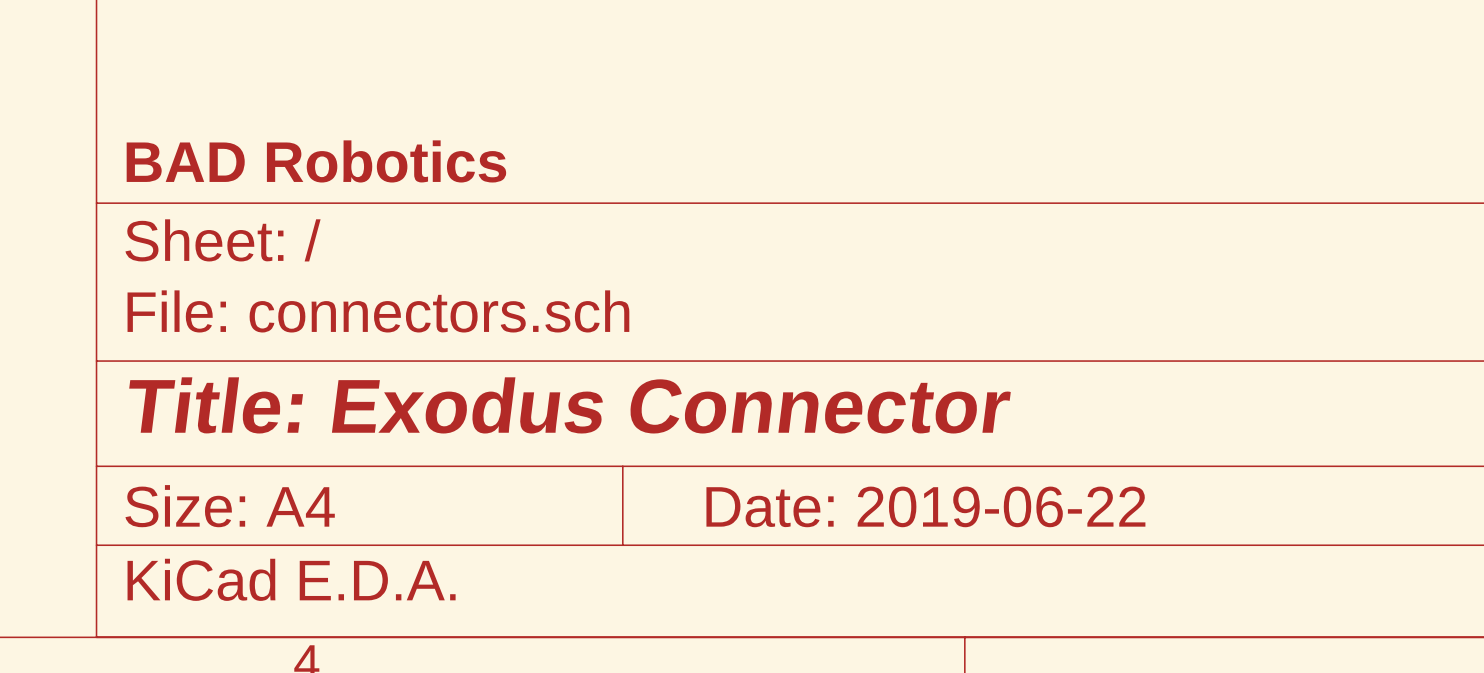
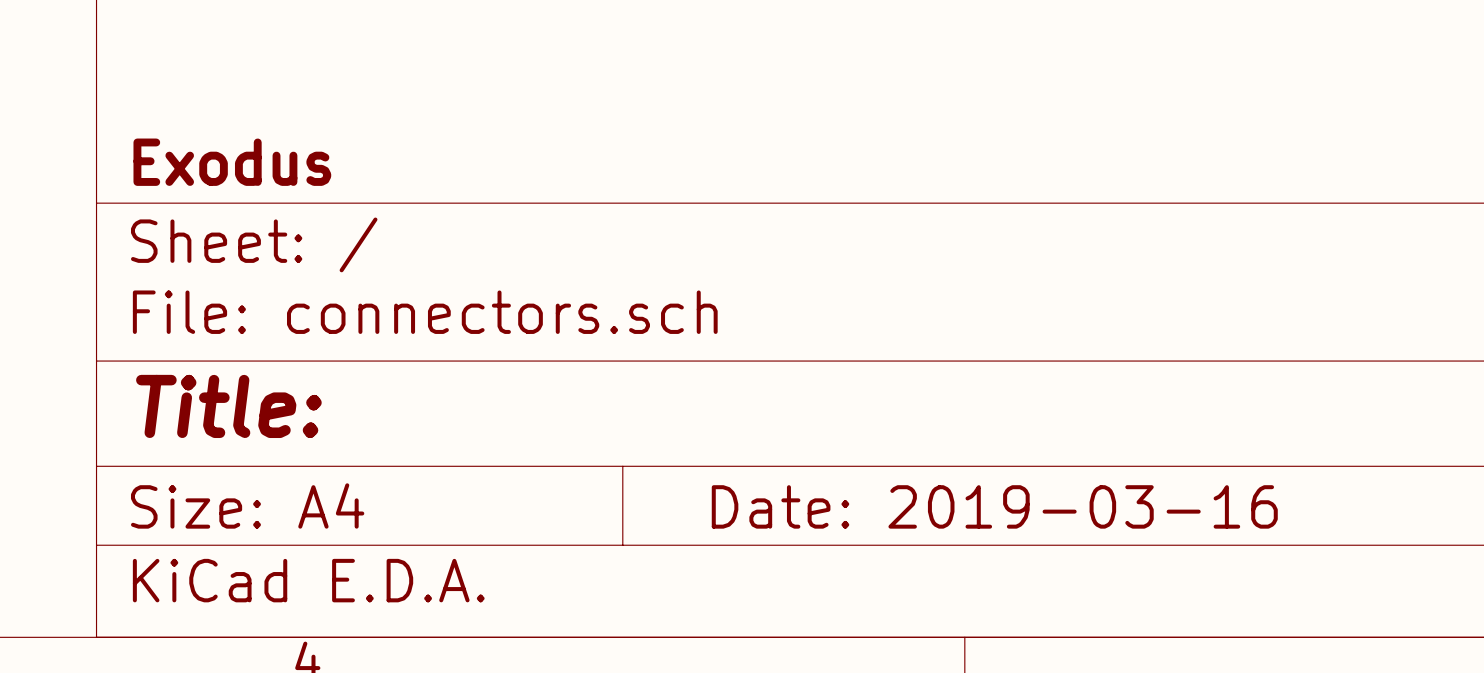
title block: BAD Robotics (316, 161) -> Exodus (232, 162)
title block: Title: Exodus Connector (569, 405) -> Title: (228, 406)
title block: Date: 2019-06-22 (925, 506) -> Date: 2019-03-16 (994, 506)

